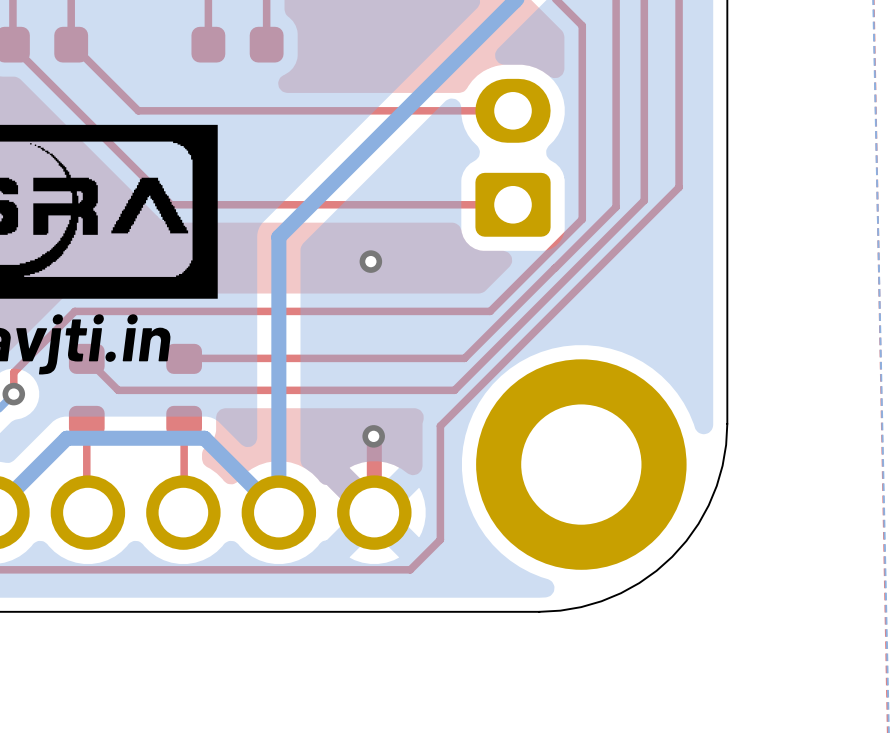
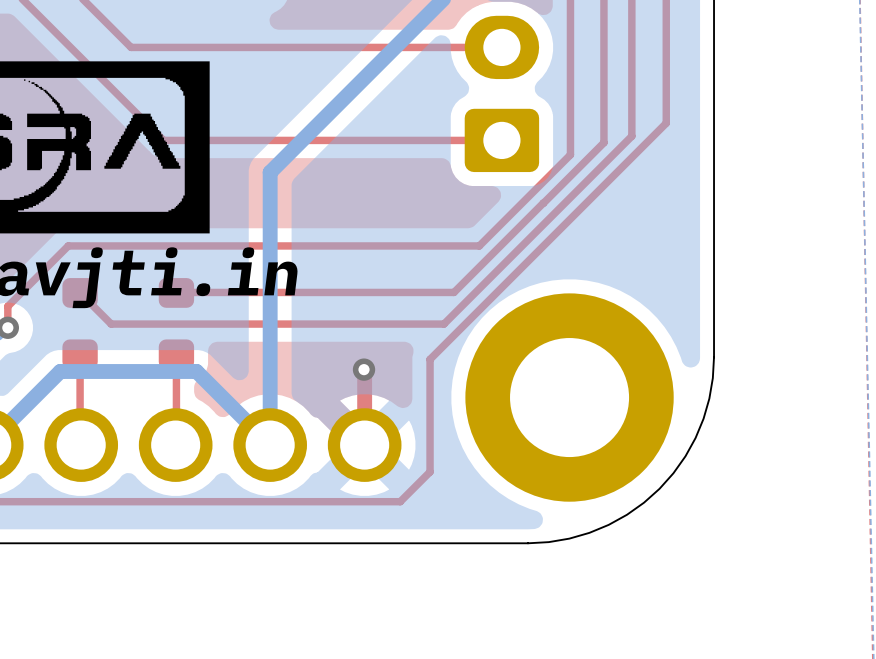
via: (370, 261) -> none

